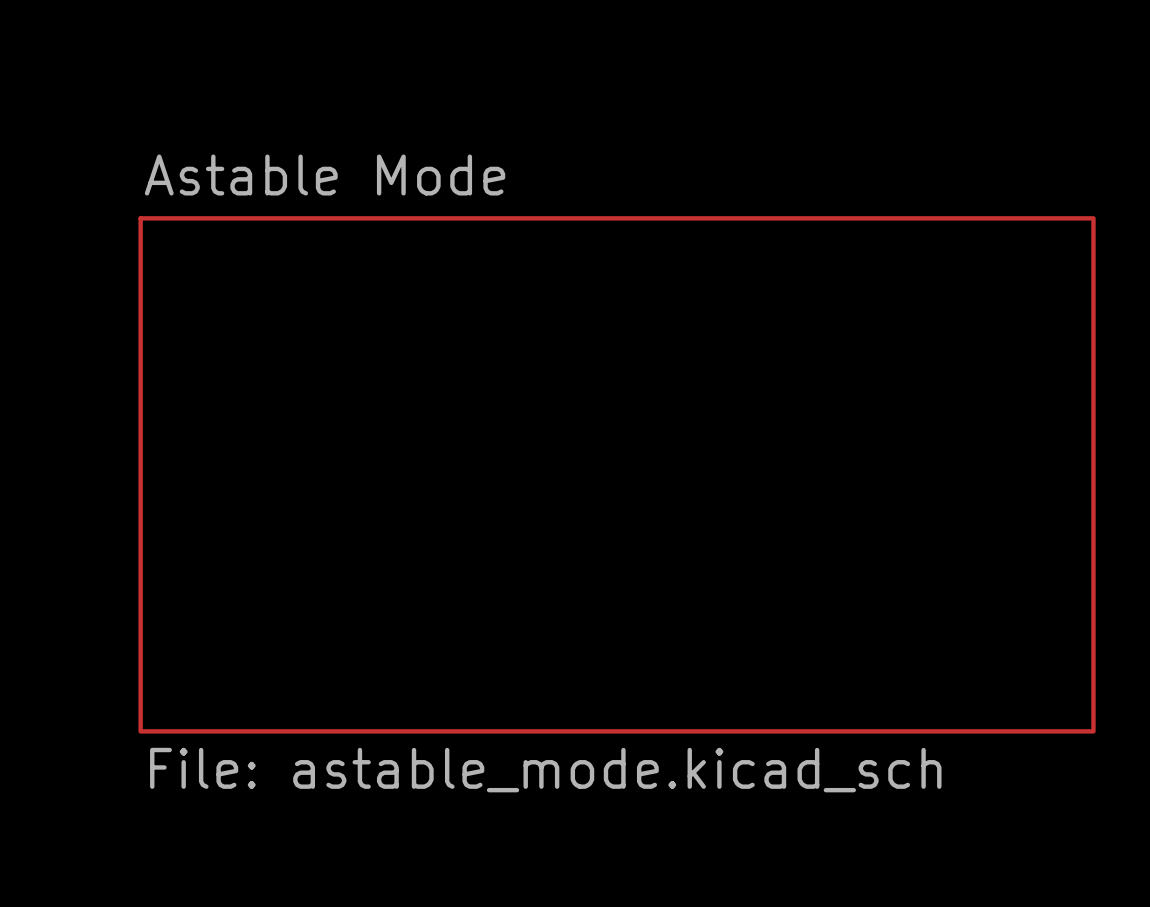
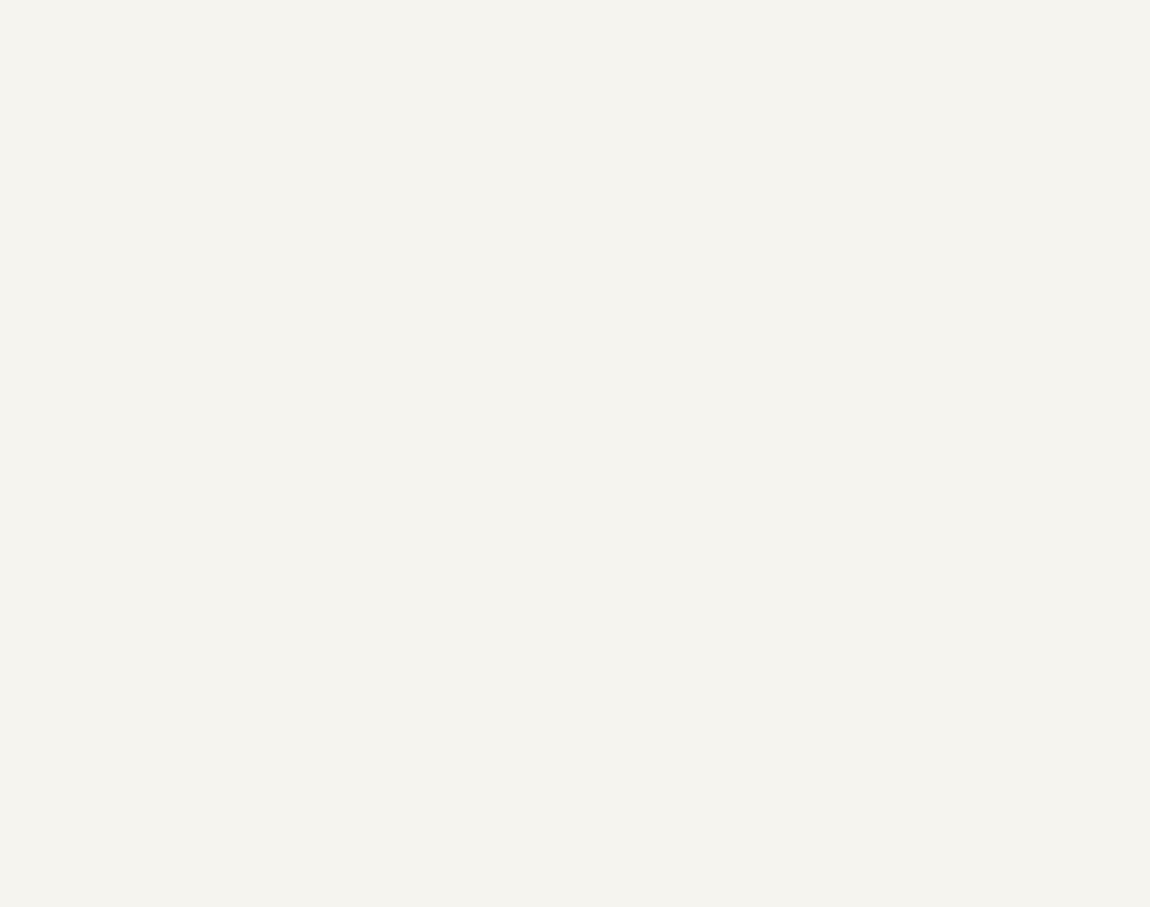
sheet Astable Mode: File: astable_mode.kicad_sch (617, 474) -> none

